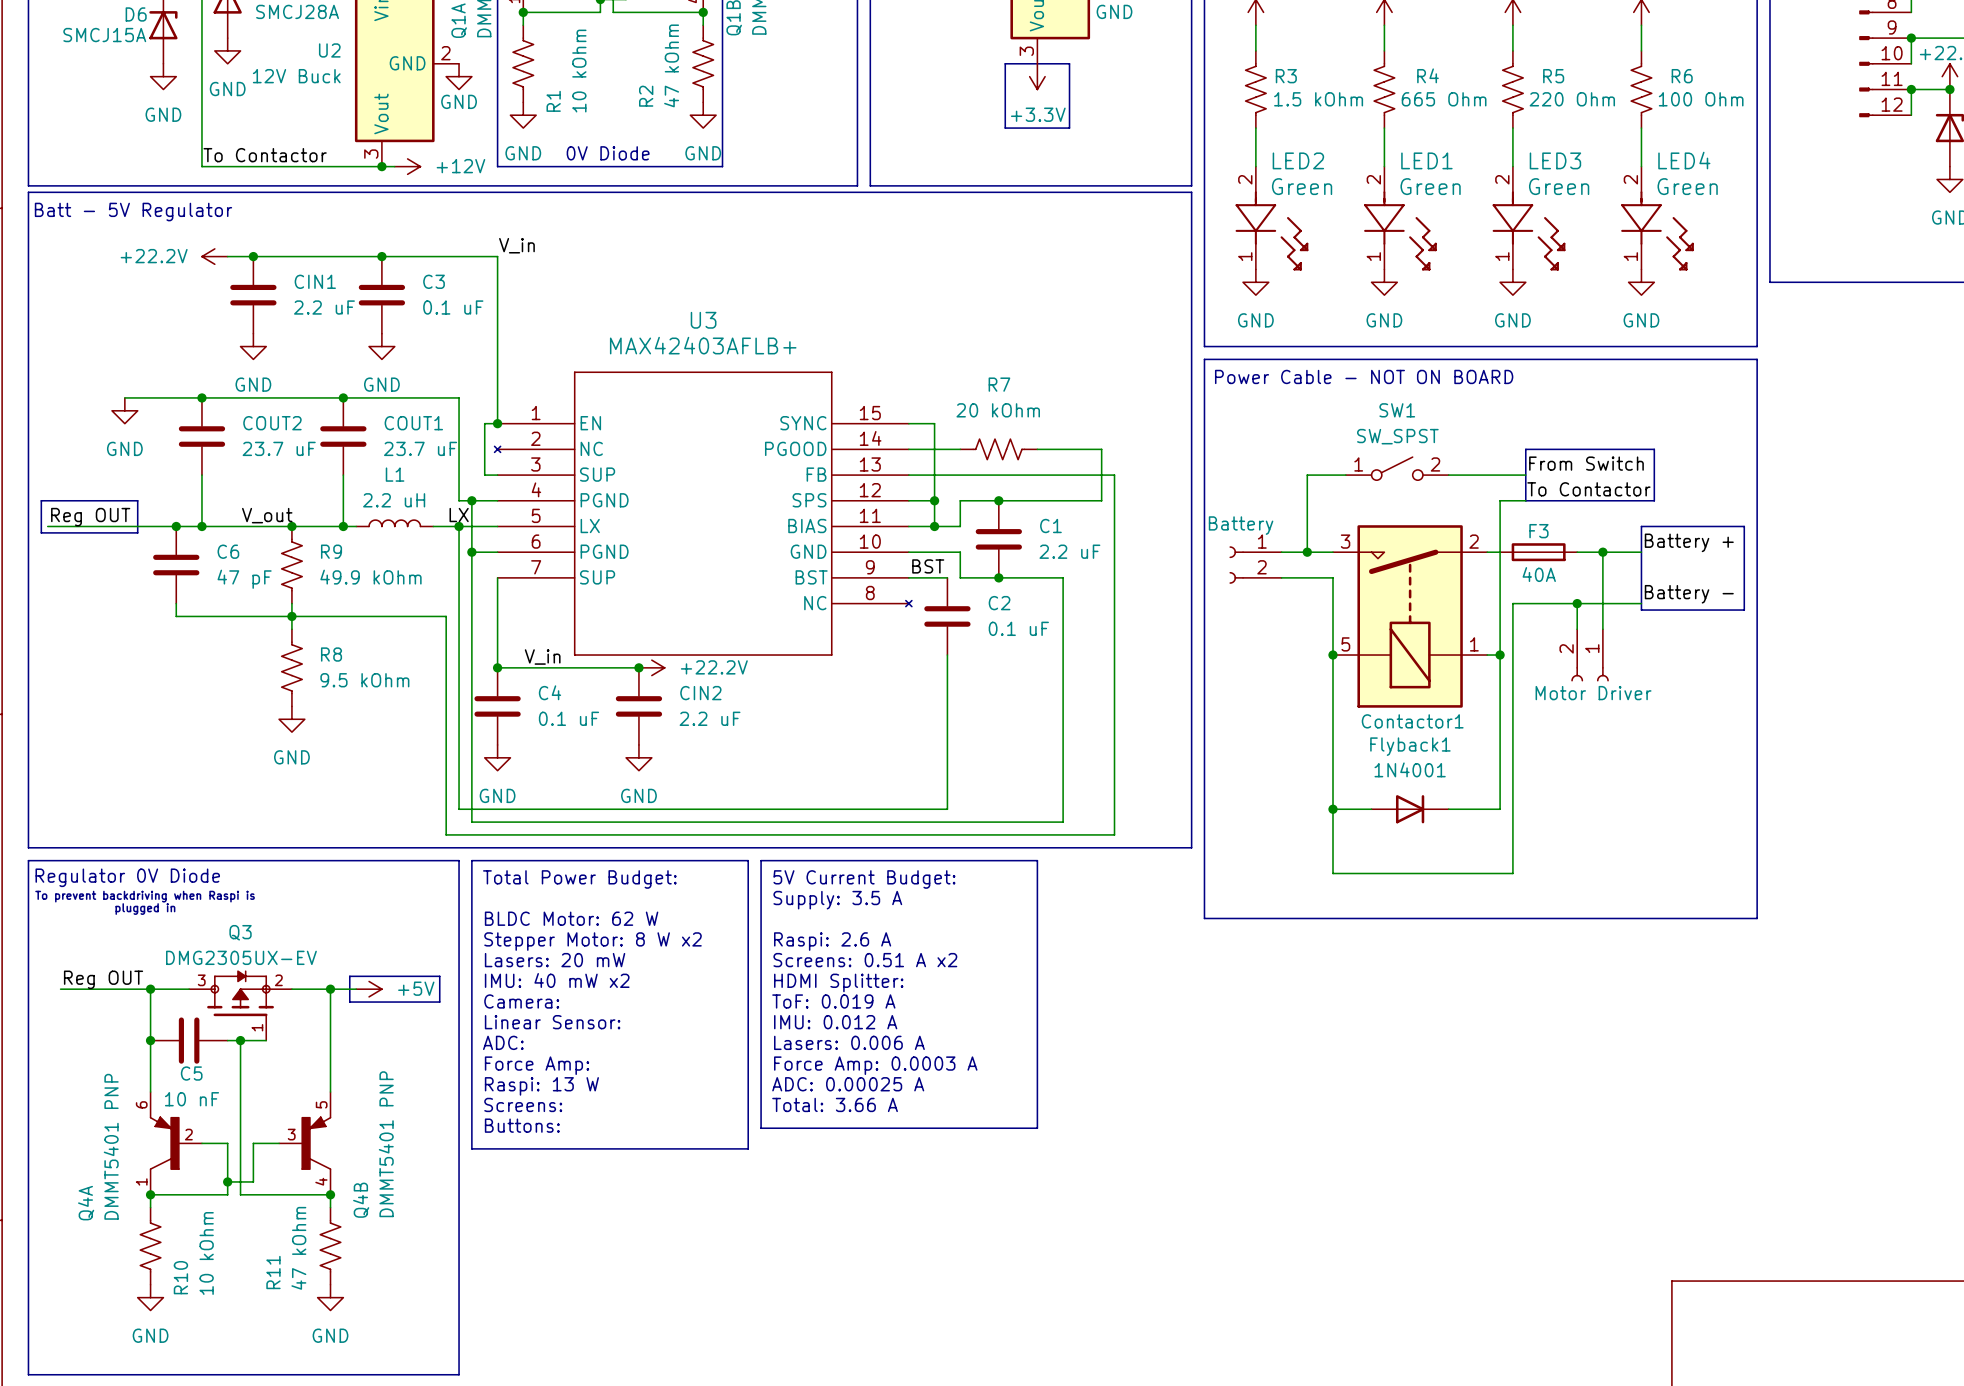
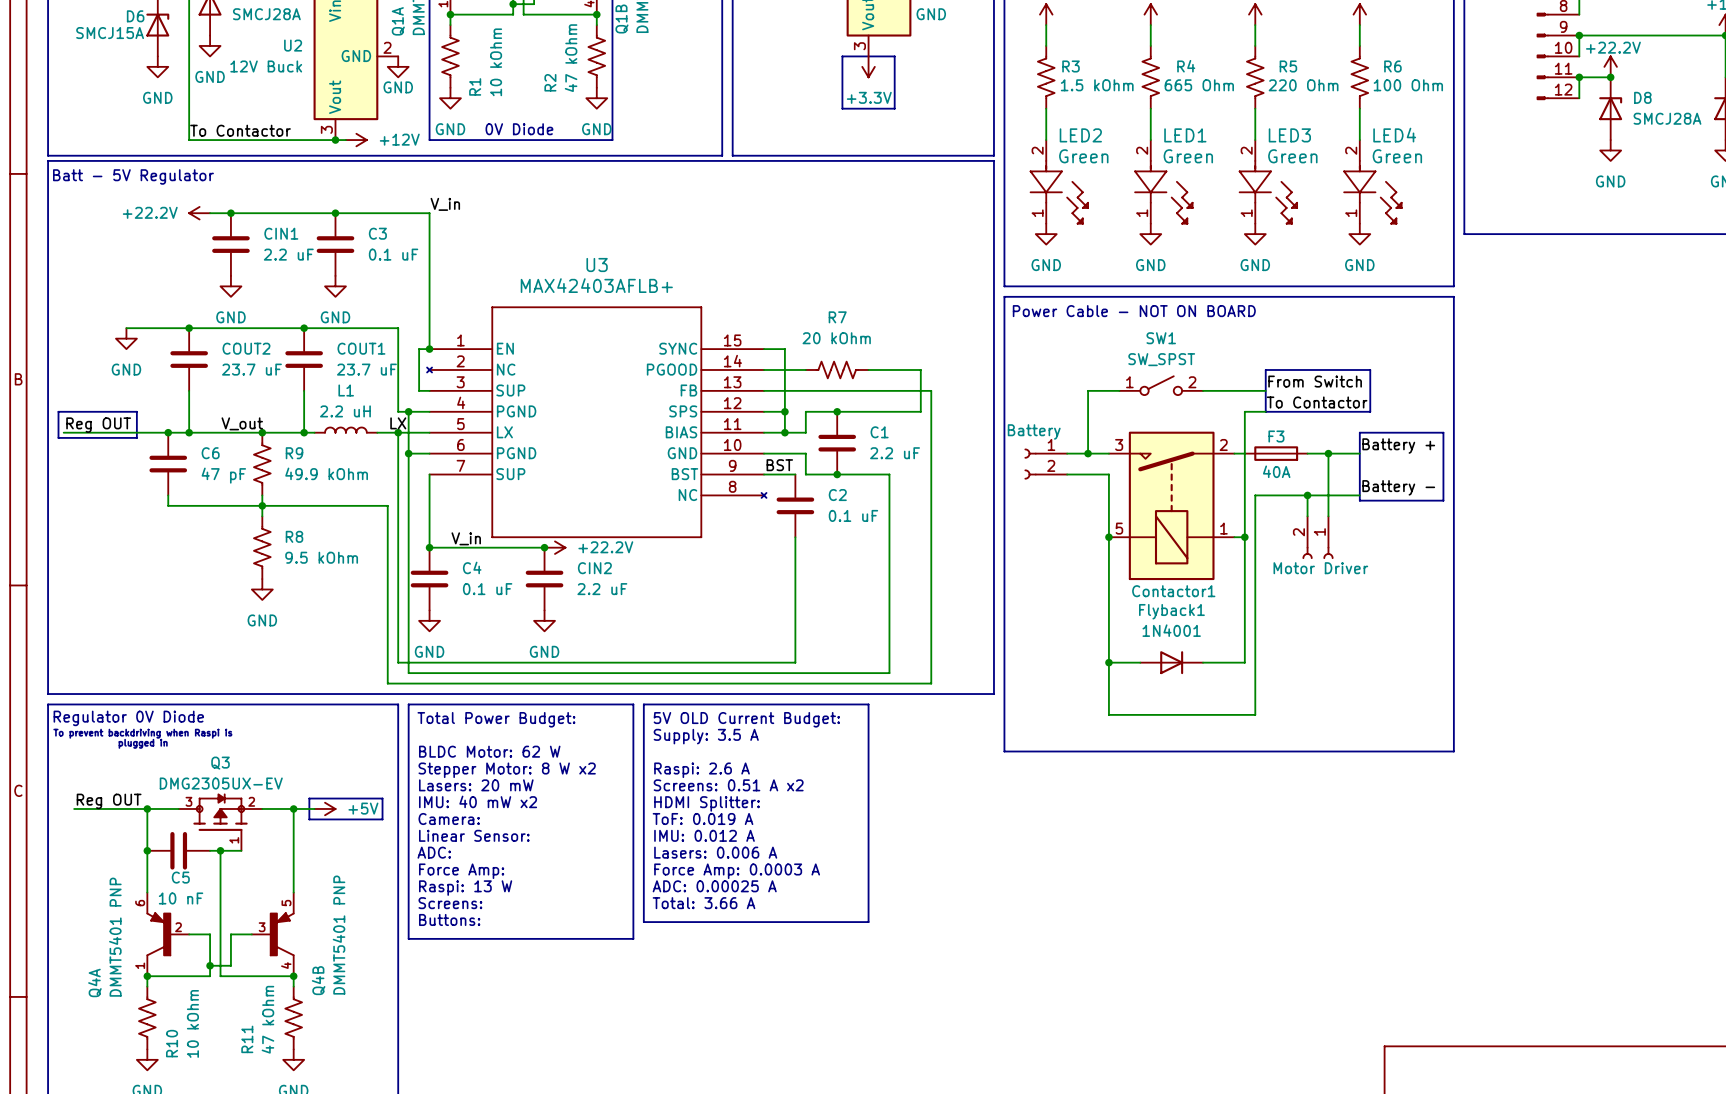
text: 5V Current Budget: (864, 879) -> 5V OLD Current Budget: (746, 719)

